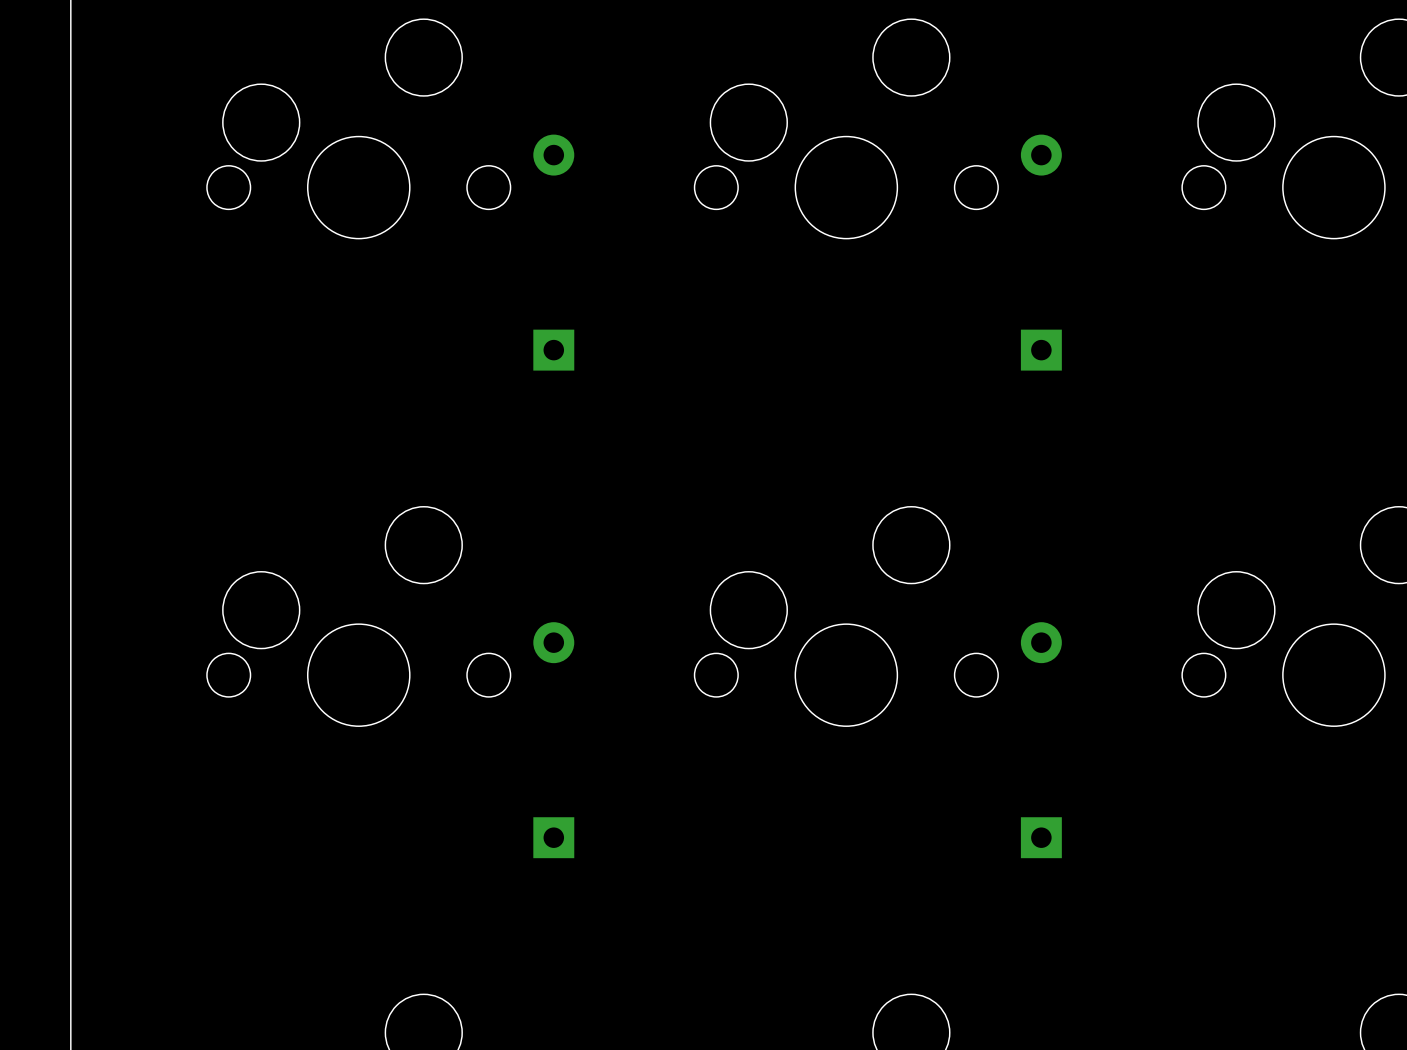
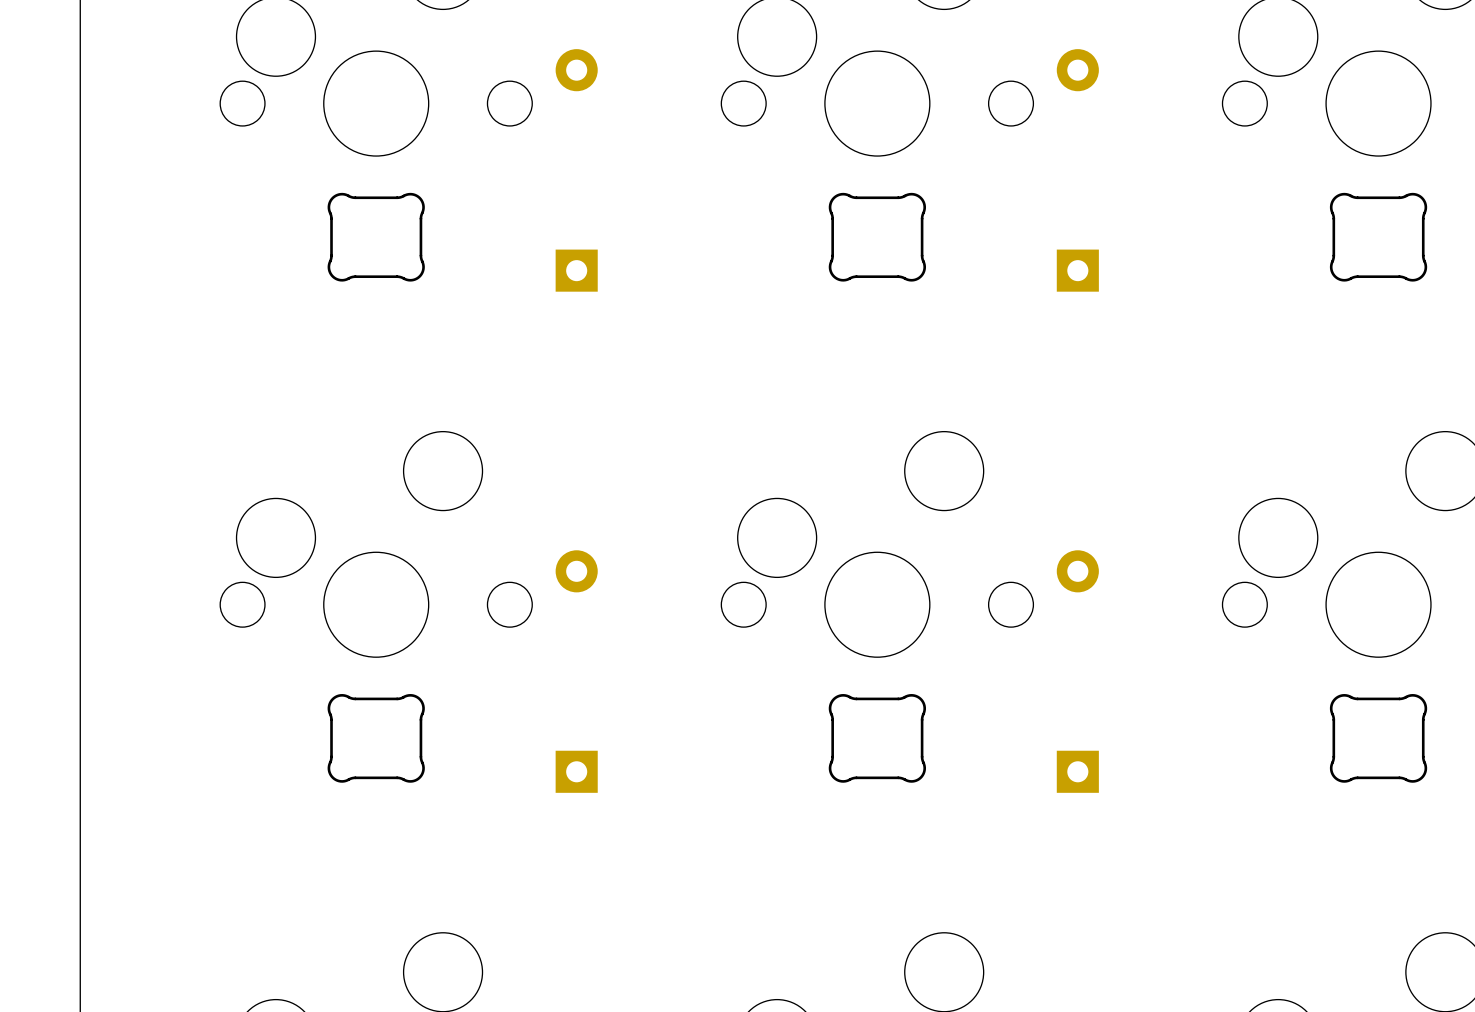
part: none -> (376, 237)
part: none -> (877, 237)
part: none -> (1378, 237)
part: none -> (376, 738)
part: none -> (877, 738)
part: none -> (1378, 738)

